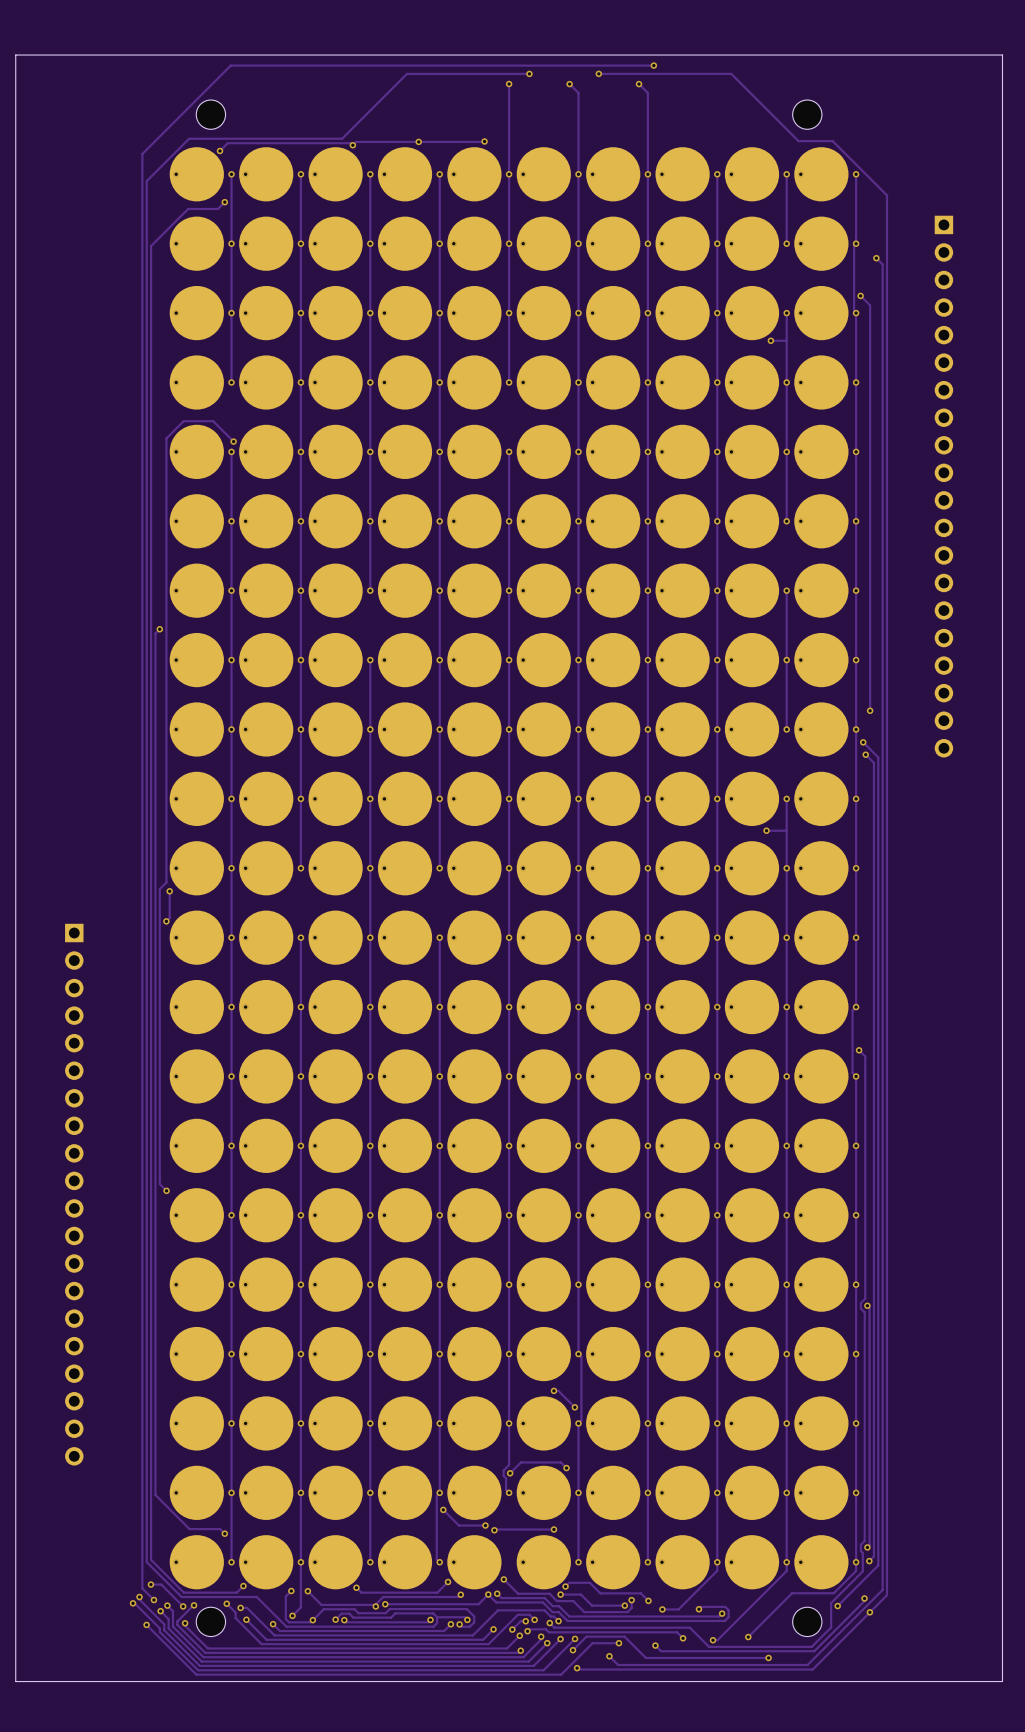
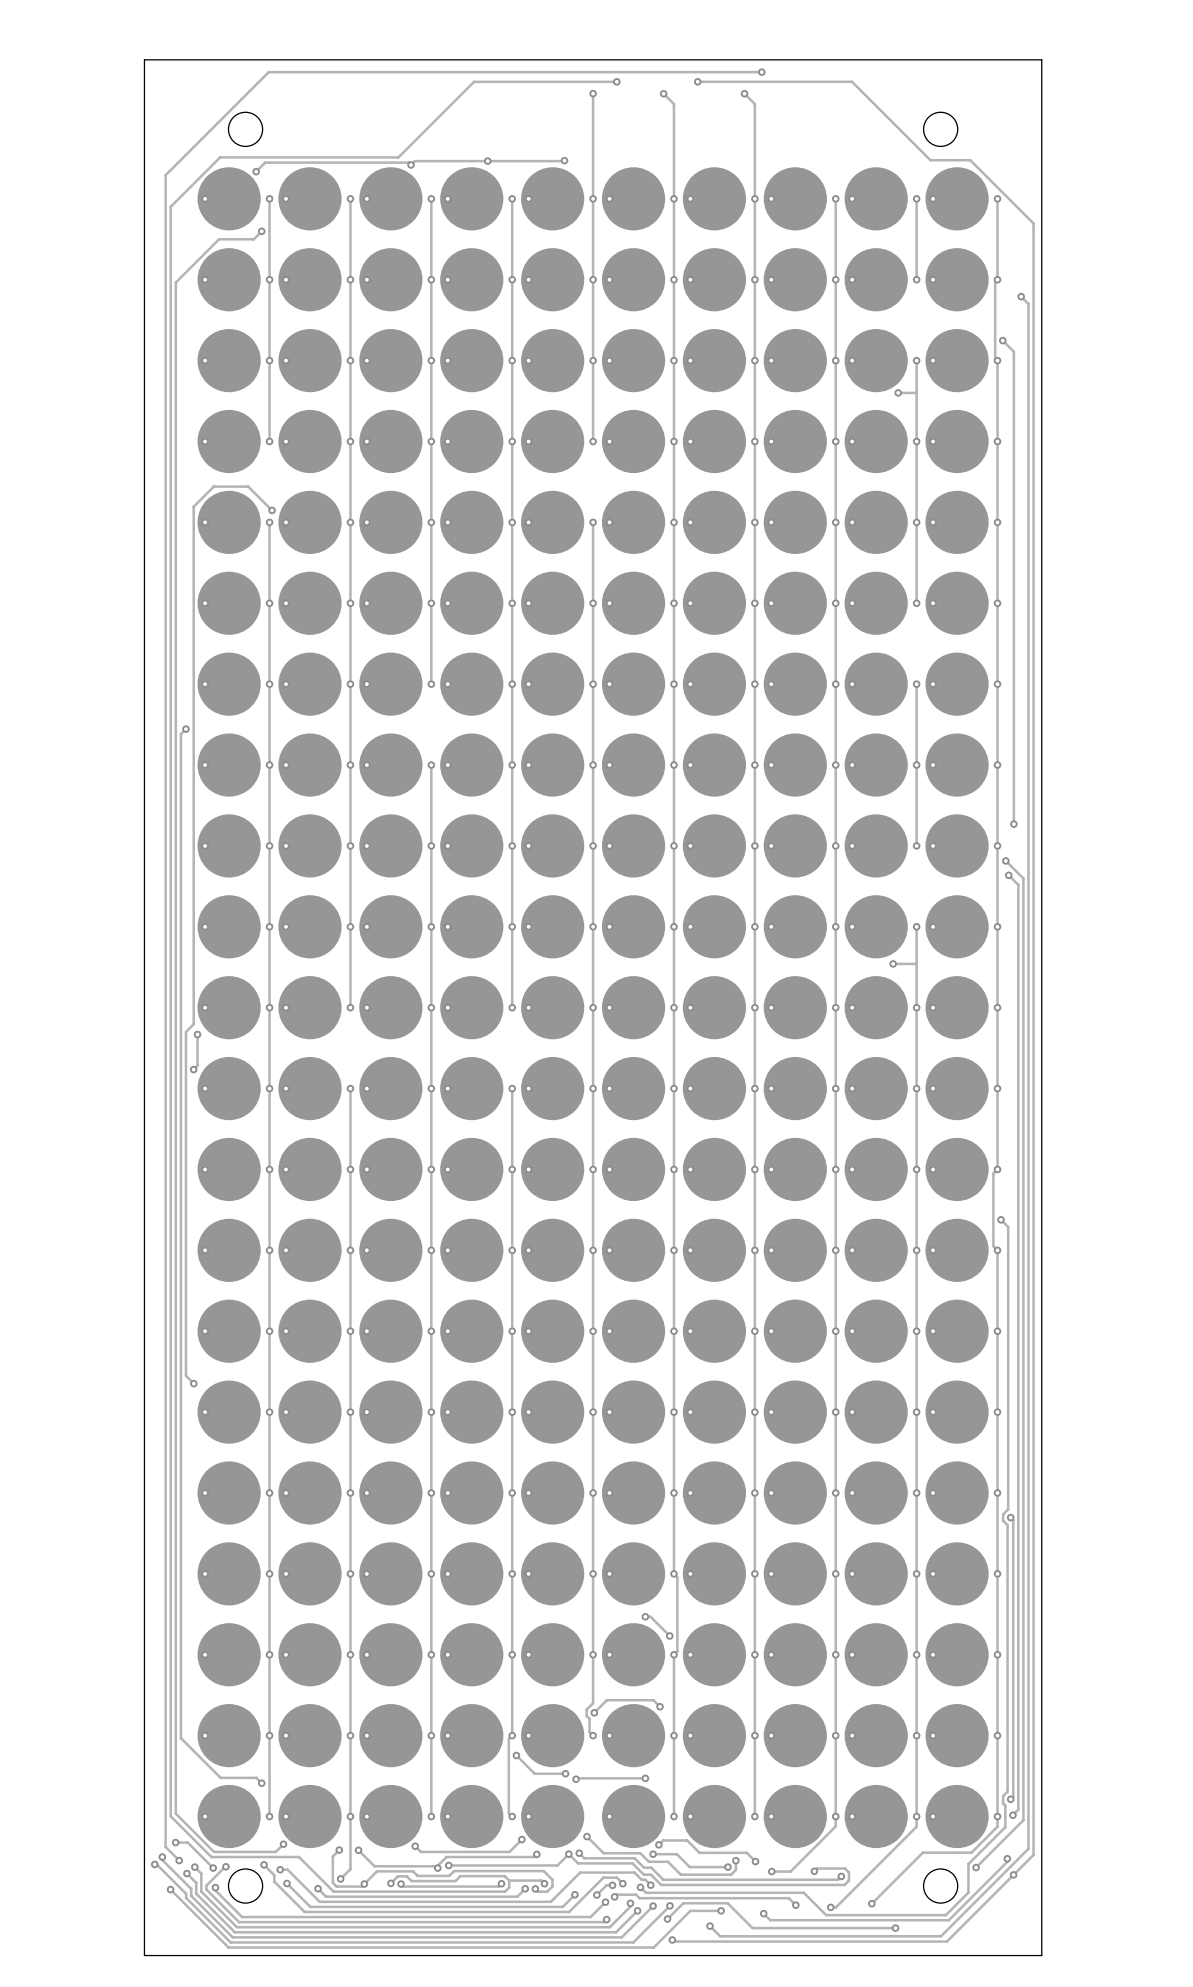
board edge: (124, 55) (15, 55) (15, 1681) (124, 1681) -> (144, 59) (144, 1955)
board edge: (894, 55) (1002, 55) (1002, 1681) (894, 1681) -> (1041, 59) (1041, 1955)
part: (943, 486) -> none
part: (74, 1194) -> none

